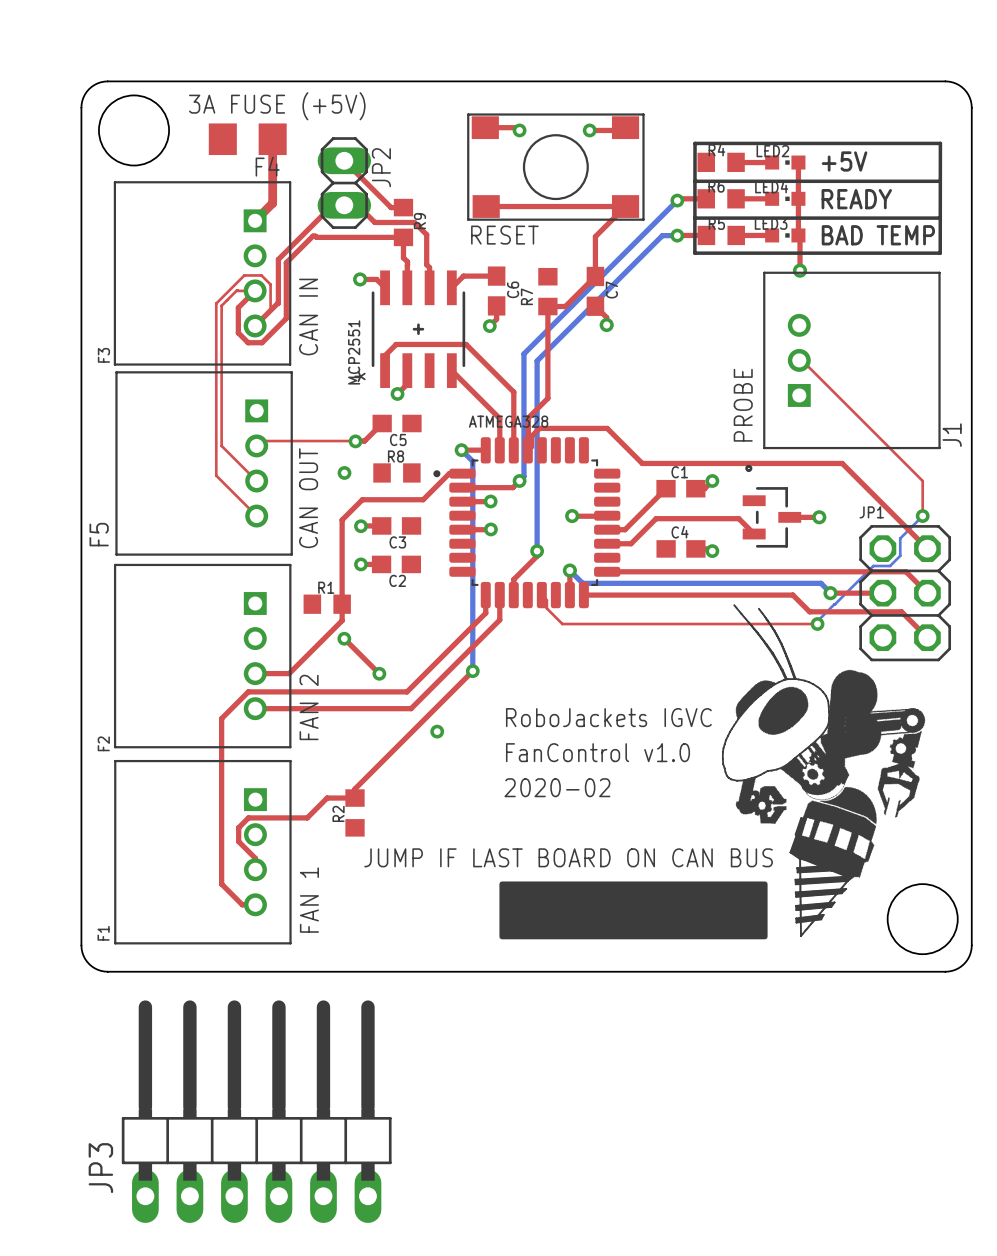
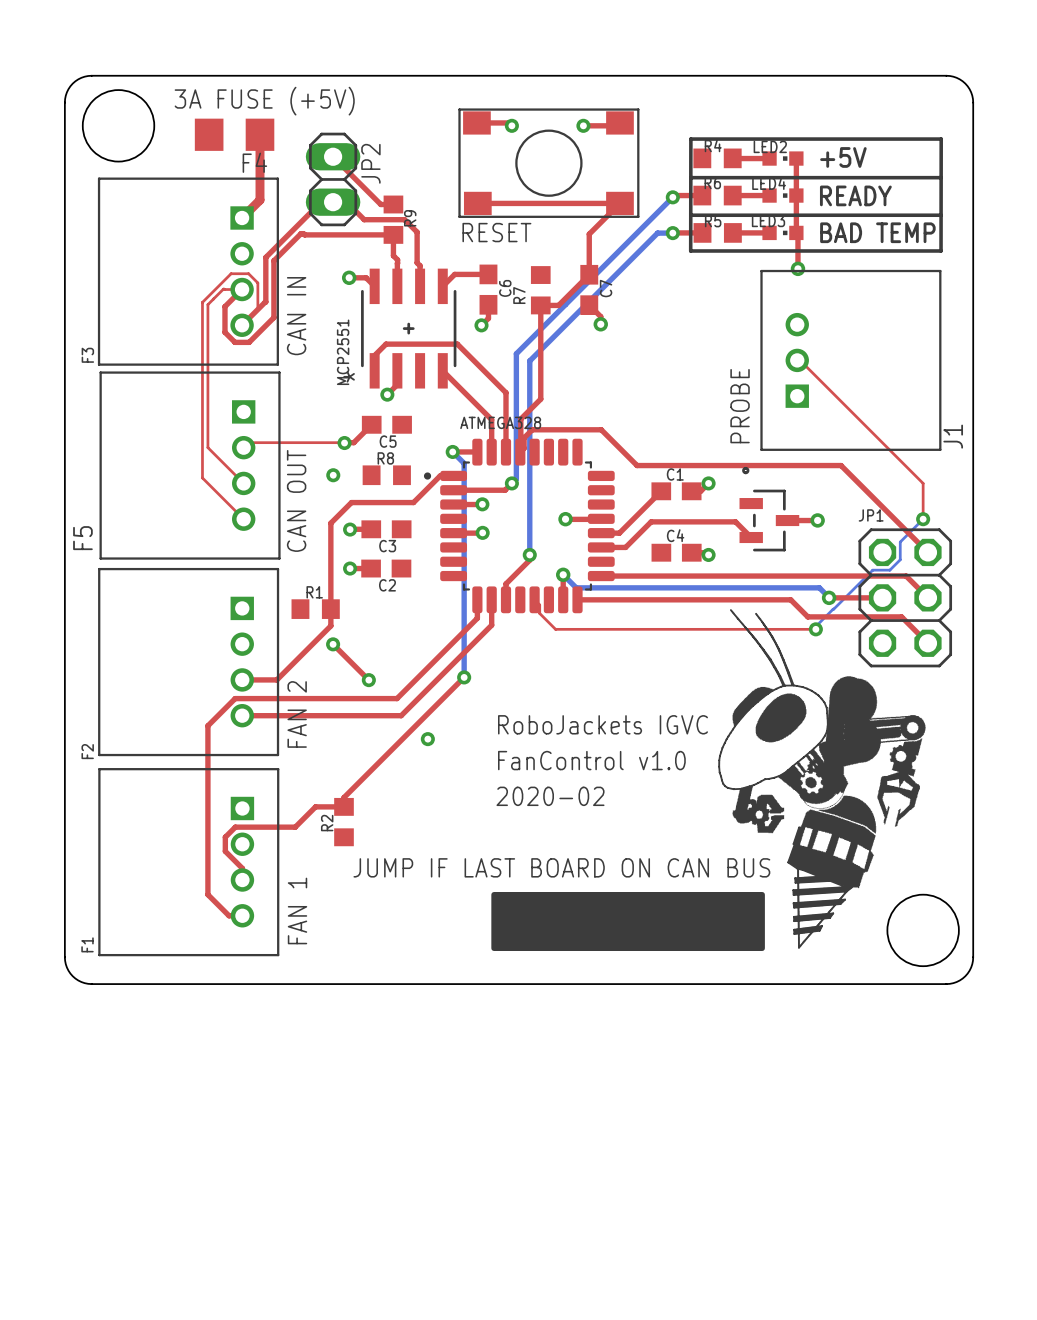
JP3: (256, 1111) -> none

